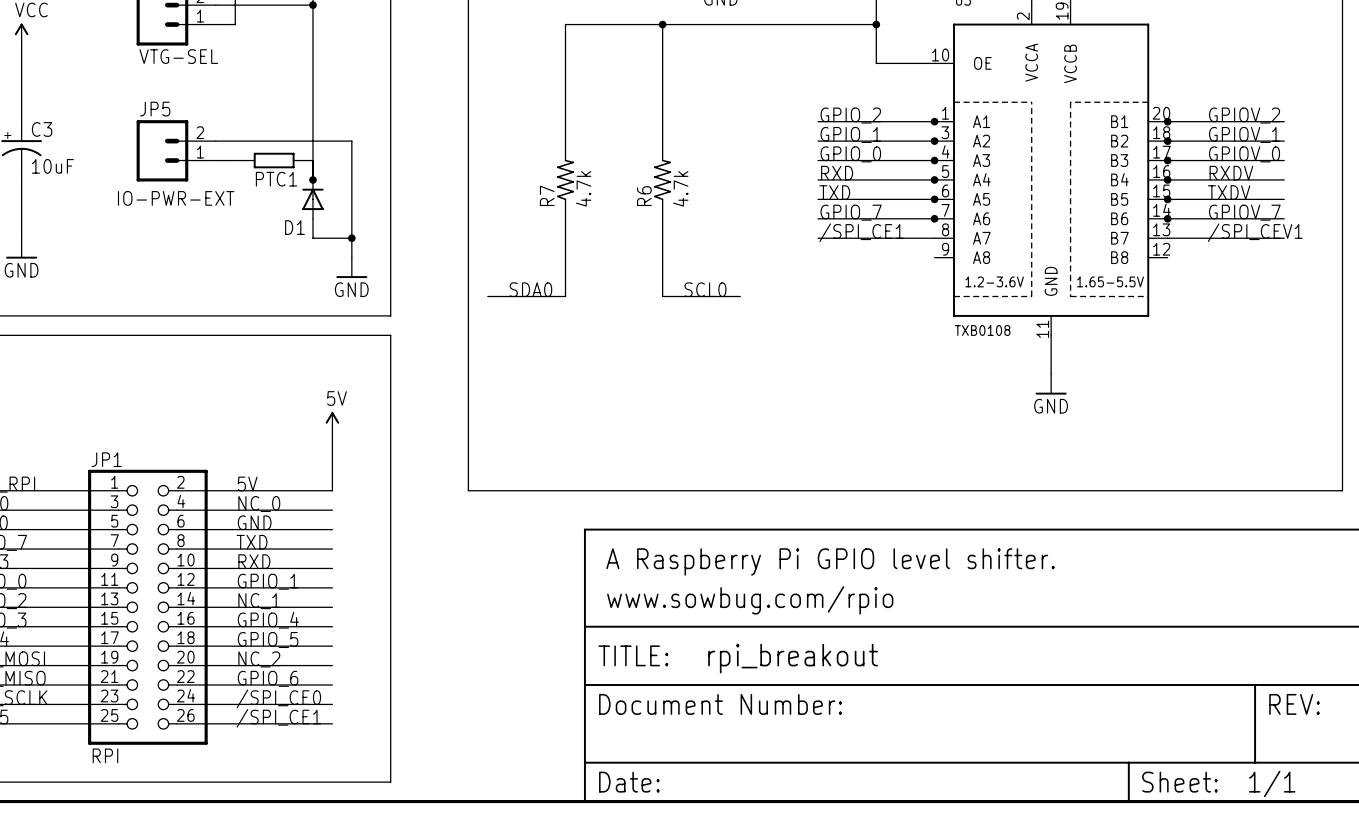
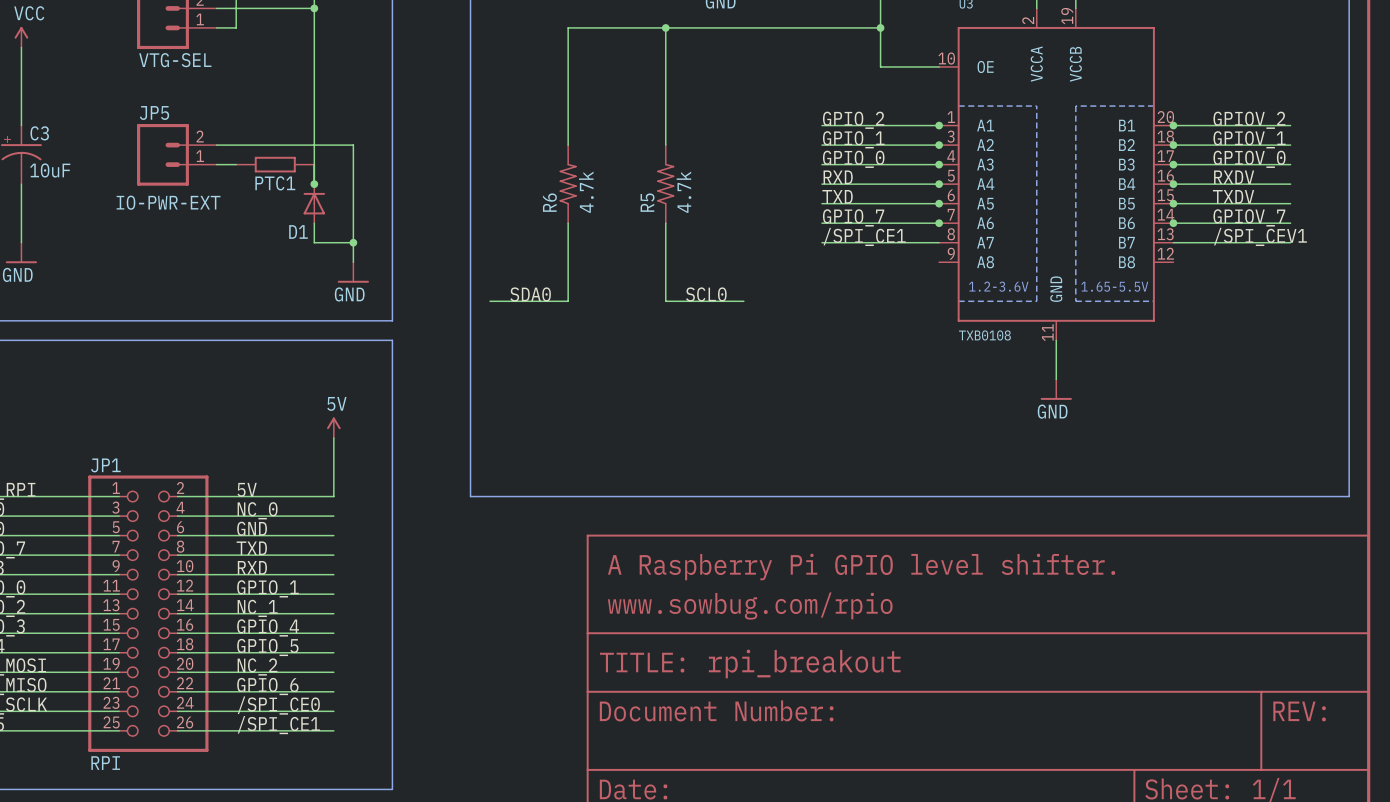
R7 name: R7 (547, 195) -> R6 (549, 202)
R6 name: R6 (644, 196) -> R5 (647, 202)

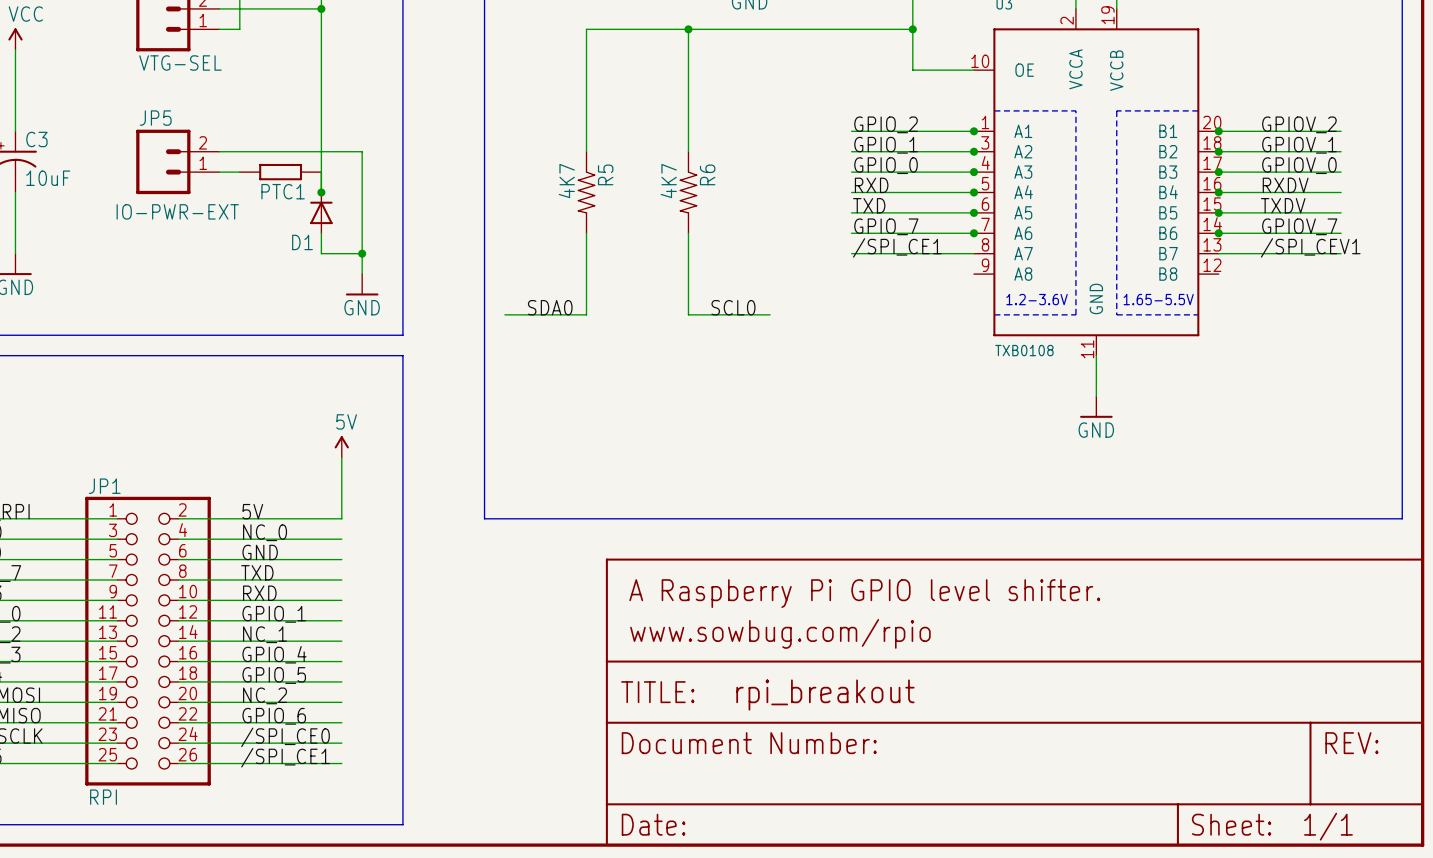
R6 symbol: [559, 145, 577, 224] -> [679, 151, 698, 234]
R5 symbol: [657, 145, 675, 224] -> [577, 151, 596, 234]
R6 value: 4.7k (586, 192) -> 4K7 (668, 181)
R5 value: 4.7k (684, 192) -> 4K7 (566, 181)
R6 name position: R6 (549, 202) -> R6 (707, 174)
R5 name position: R5 (647, 202) -> R5 (605, 174)

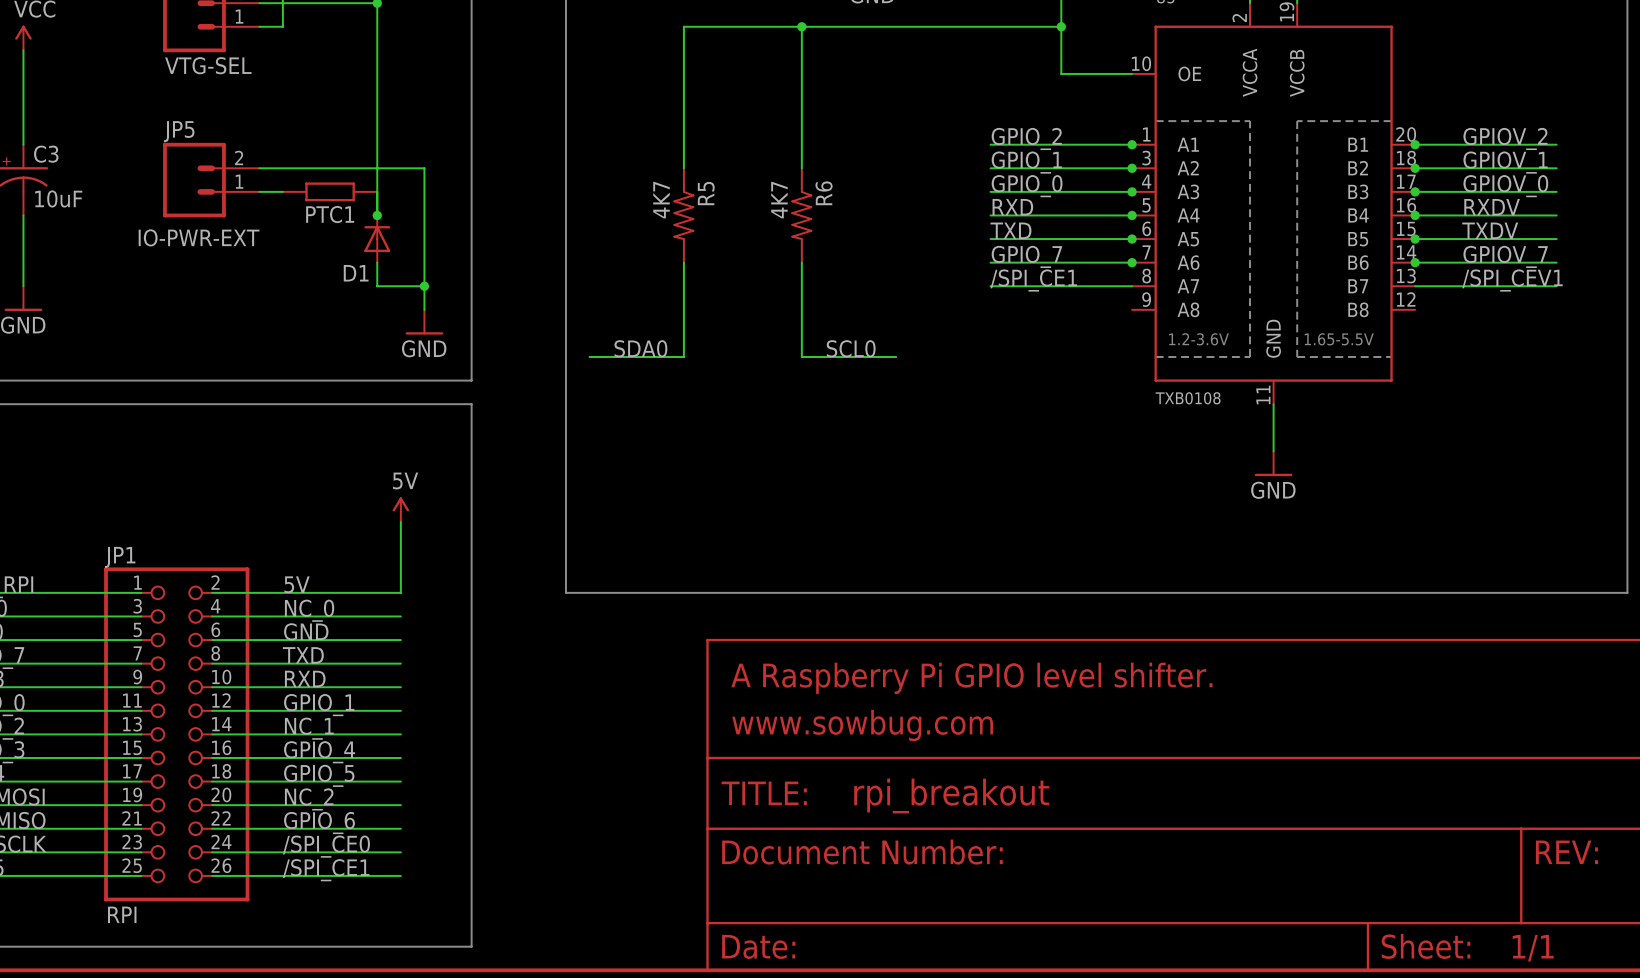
text: www.sowbug.com/rpio (780, 633) -> www.sowbug.com (862, 725)

